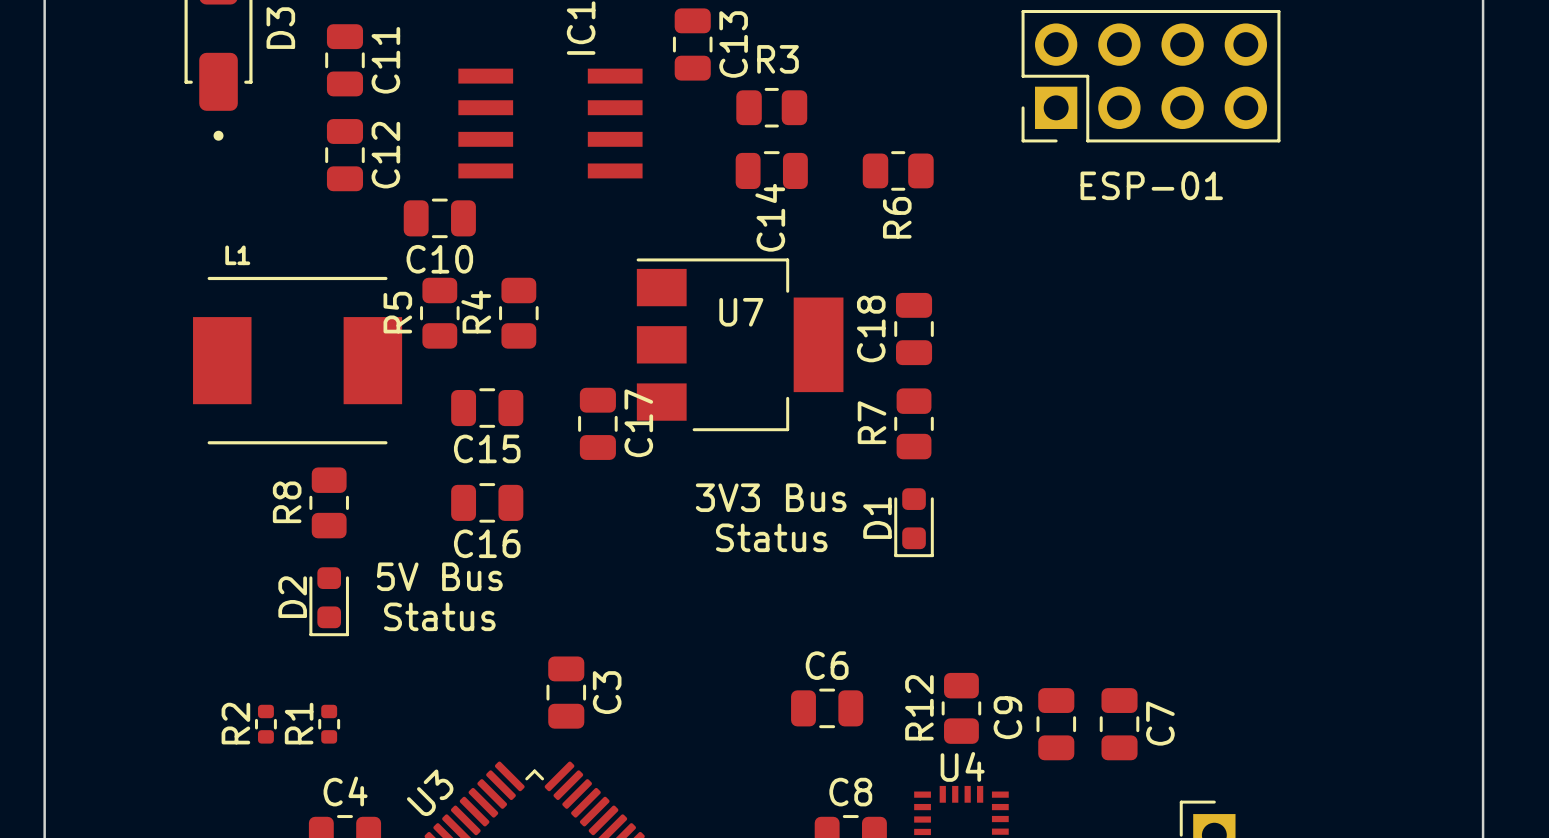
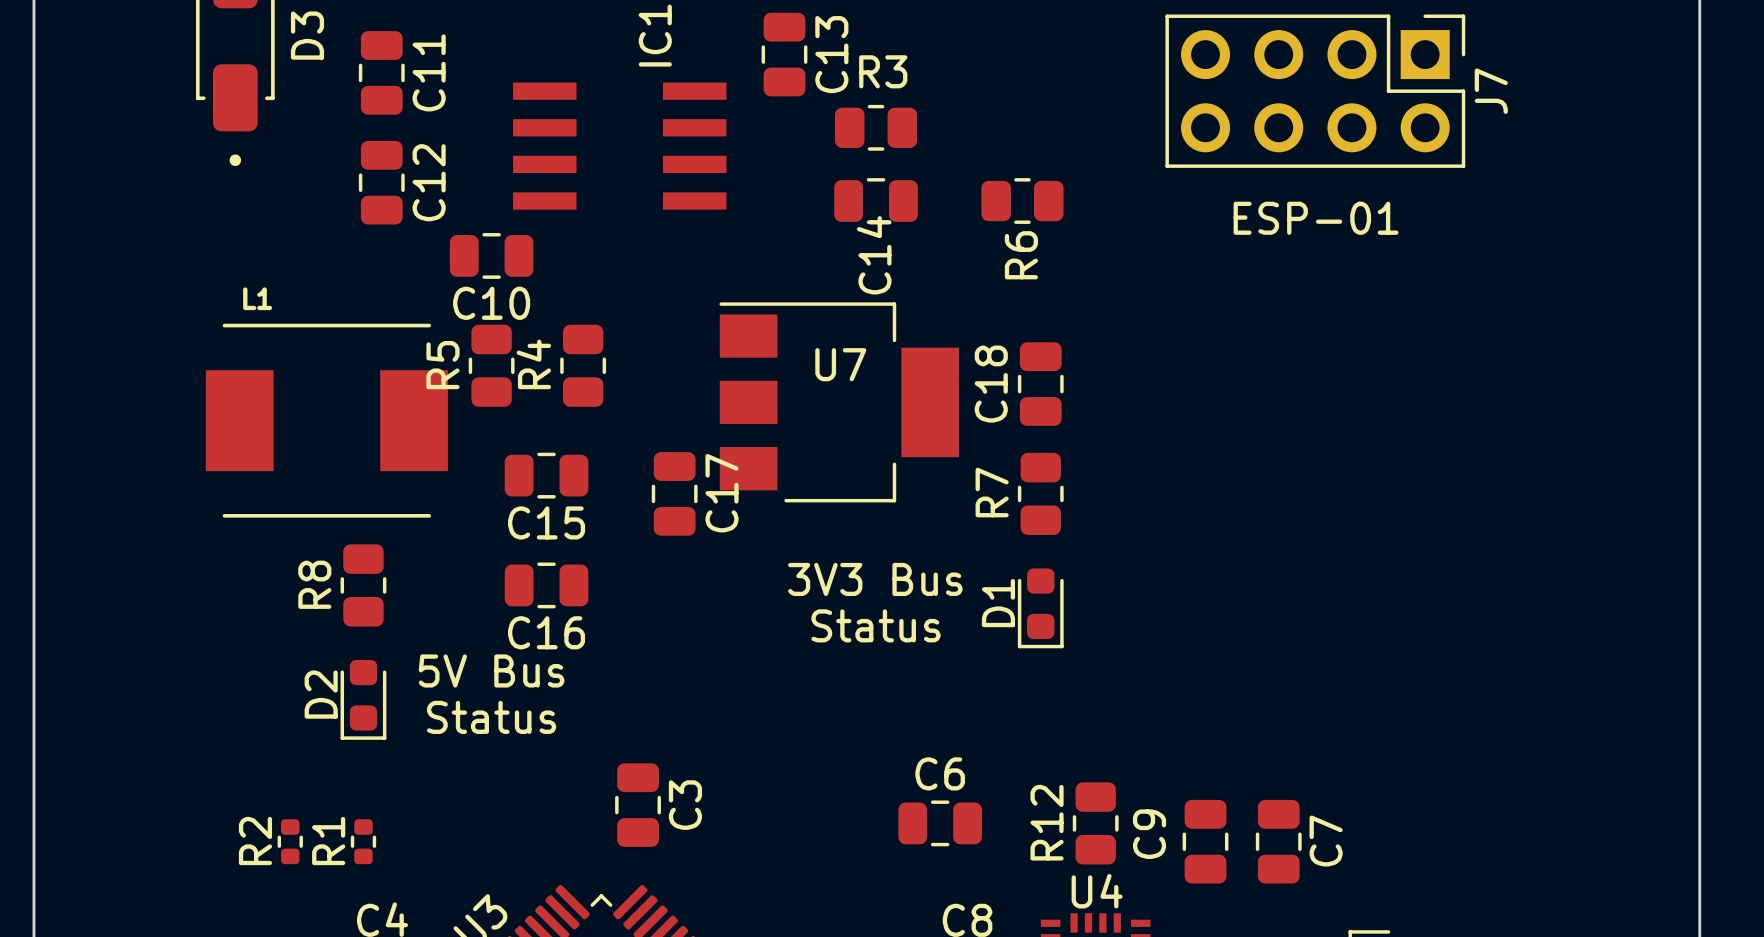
part: (1151, 76) -> none
J7: none -> (1315, 91)

